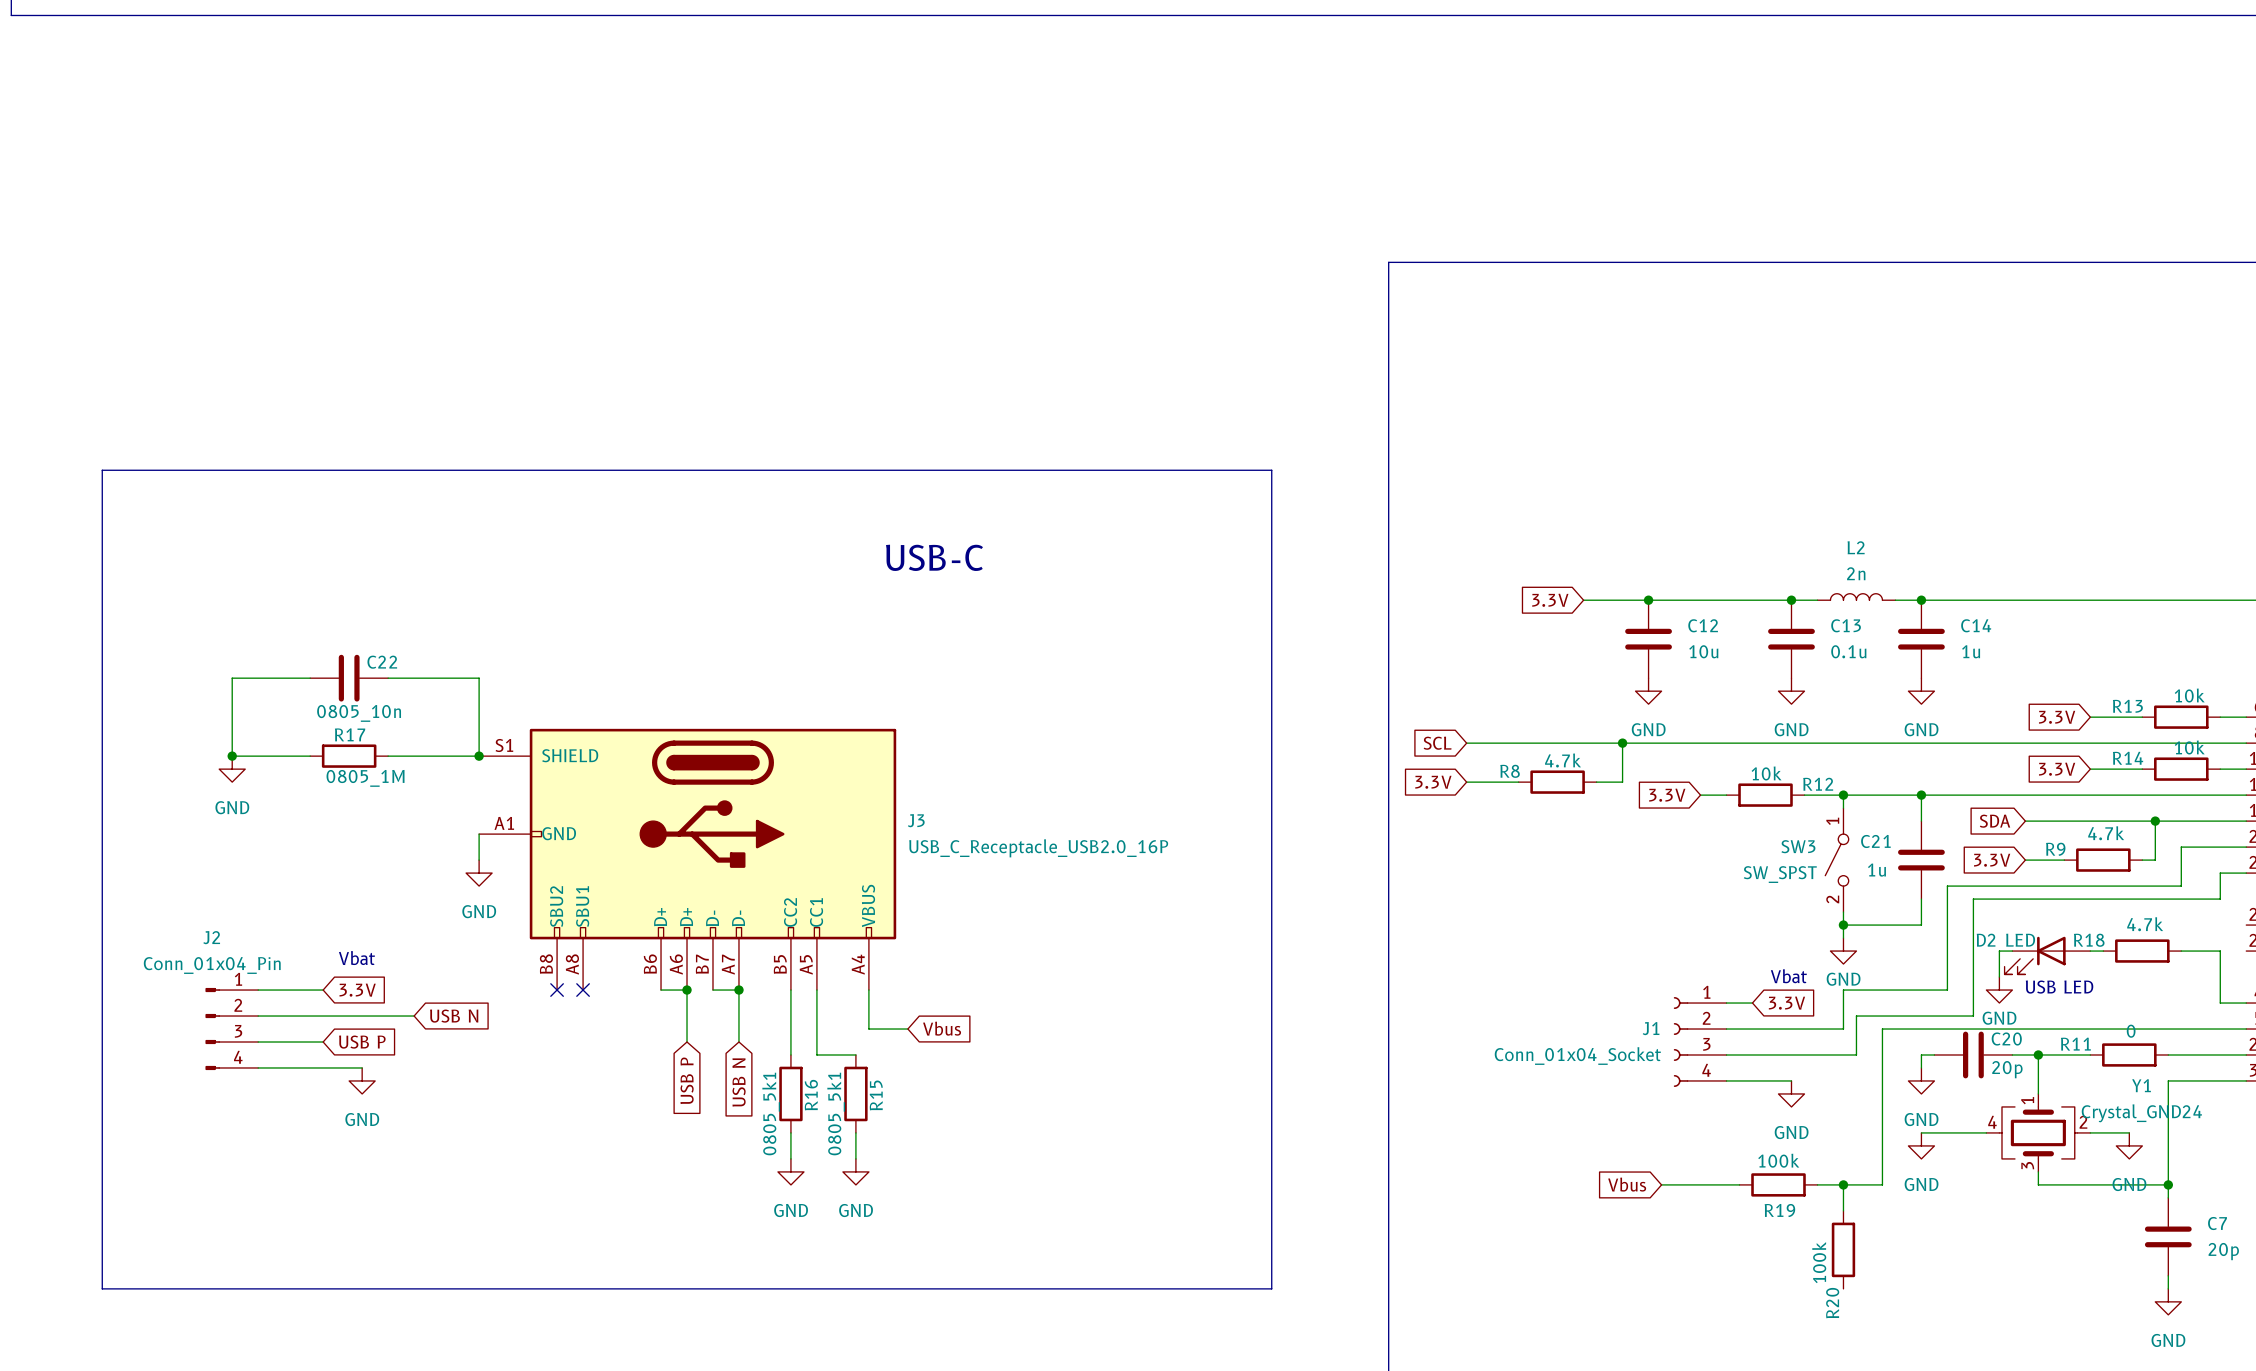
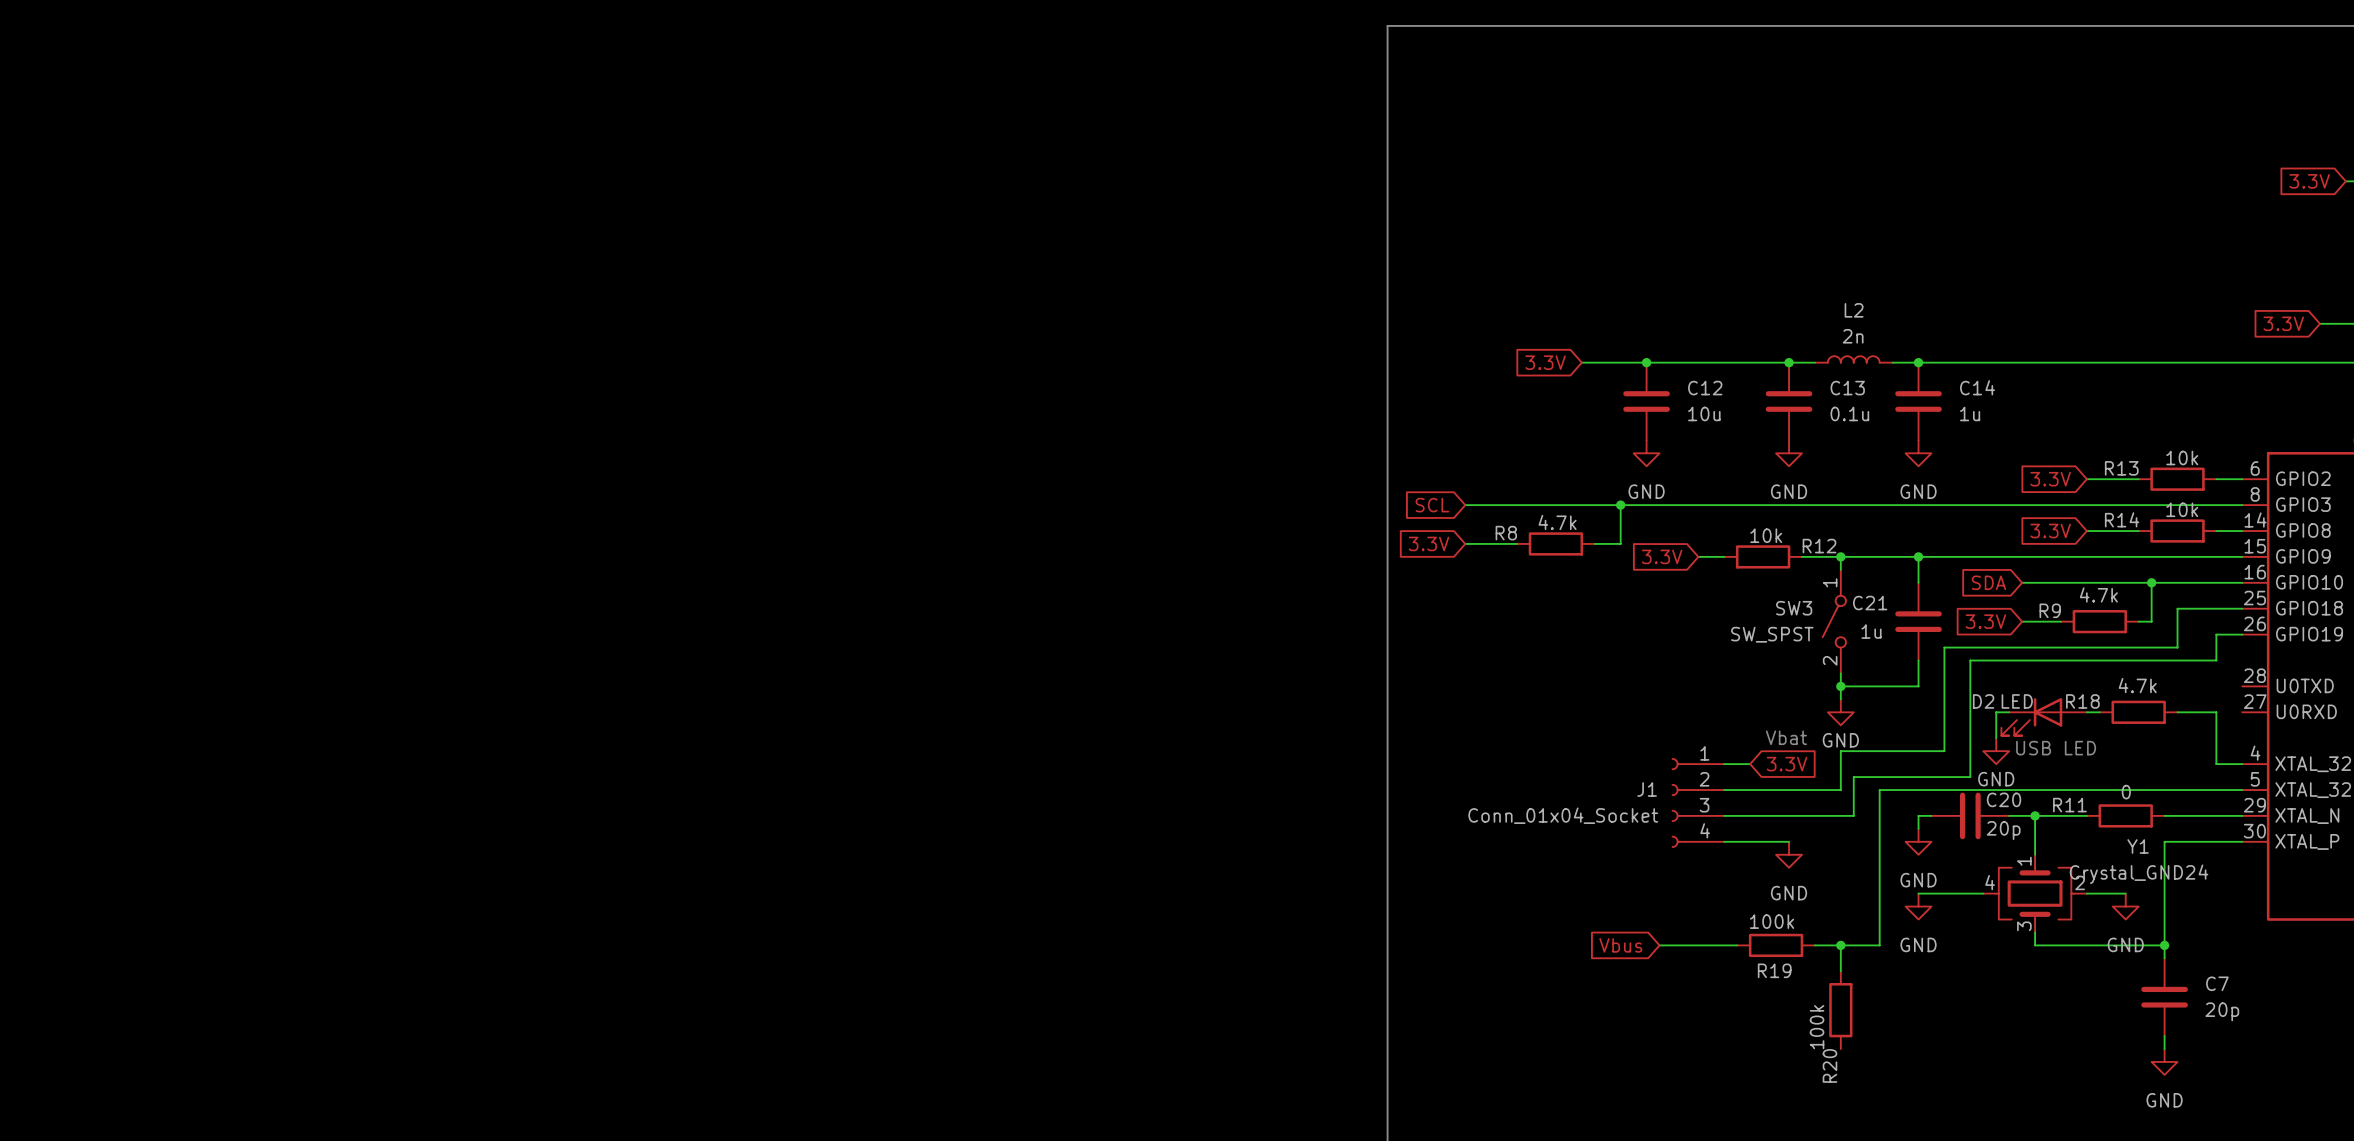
line: (102, 470) (1271, 470) (1271, 1288) (102, 1288) (102, 470) -> none
text: USB-C (934, 557) -> none
wire: (310, 678) (232, 678) (232, 756) (310, 756) -> none
C22: 0805_10n (349, 678) -> none
wire: (388, 678) (479, 678) (479, 756) (388, 756) -> none
junction: (232, 756) -> none
R17: 0805_1M (349, 756) -> none
junction: (479, 756) -> none
power symbol: GND (232, 769) -> none
wire: (479, 834) (479, 860) -> none
J3: USB_C_Receptacle_USB2.0_16P (687, 859) -> none
power symbol: GND (479, 873) -> none
text: Vbat (356, 958) -> none
wire: (258, 990) (323, 990) -> none
global label: 3.3V (357, 990) -> none
no-connect mark: (557, 990) -> none
no-connect mark: (583, 990) -> none
wire: (661, 990) (687, 990) (687, 1042) -> none
junction: (687, 990) -> none
wire: (712, 990) (738, 990) (738, 1042) -> none
junction: (738, 990) -> none
wire: (790, 990) (790, 1054) -> none
wire: (816, 990) (816, 1054) (855, 1054) -> none
wire: (868, 990) (868, 1029) (907, 1029) -> none
wire: (258, 1016) (414, 1016) -> none
global label: USB N (454, 1016) -> none
global label: Vbus (942, 1028) -> none
J2: Conn_01x04_Pin (231, 1029) -> none
wire: (258, 1042) (323, 1042) -> none
global label: USB P (362, 1042) -> none
wire: (258, 1067) (362, 1067) -> none
power symbol: GND (362, 1080) -> none
global label: USB P (687, 1080) -> none
global label: USB N (739, 1082) -> none
R16: 0805_5k1 (790, 1093) -> none
R15: 0805_5k1 (855, 1093) -> none
wire: (790, 1132) (790, 1158) -> none
wire: (855, 1132) (855, 1158) -> none
power symbol: GND (790, 1171) -> none
power symbol: GND (855, 1171) -> none

